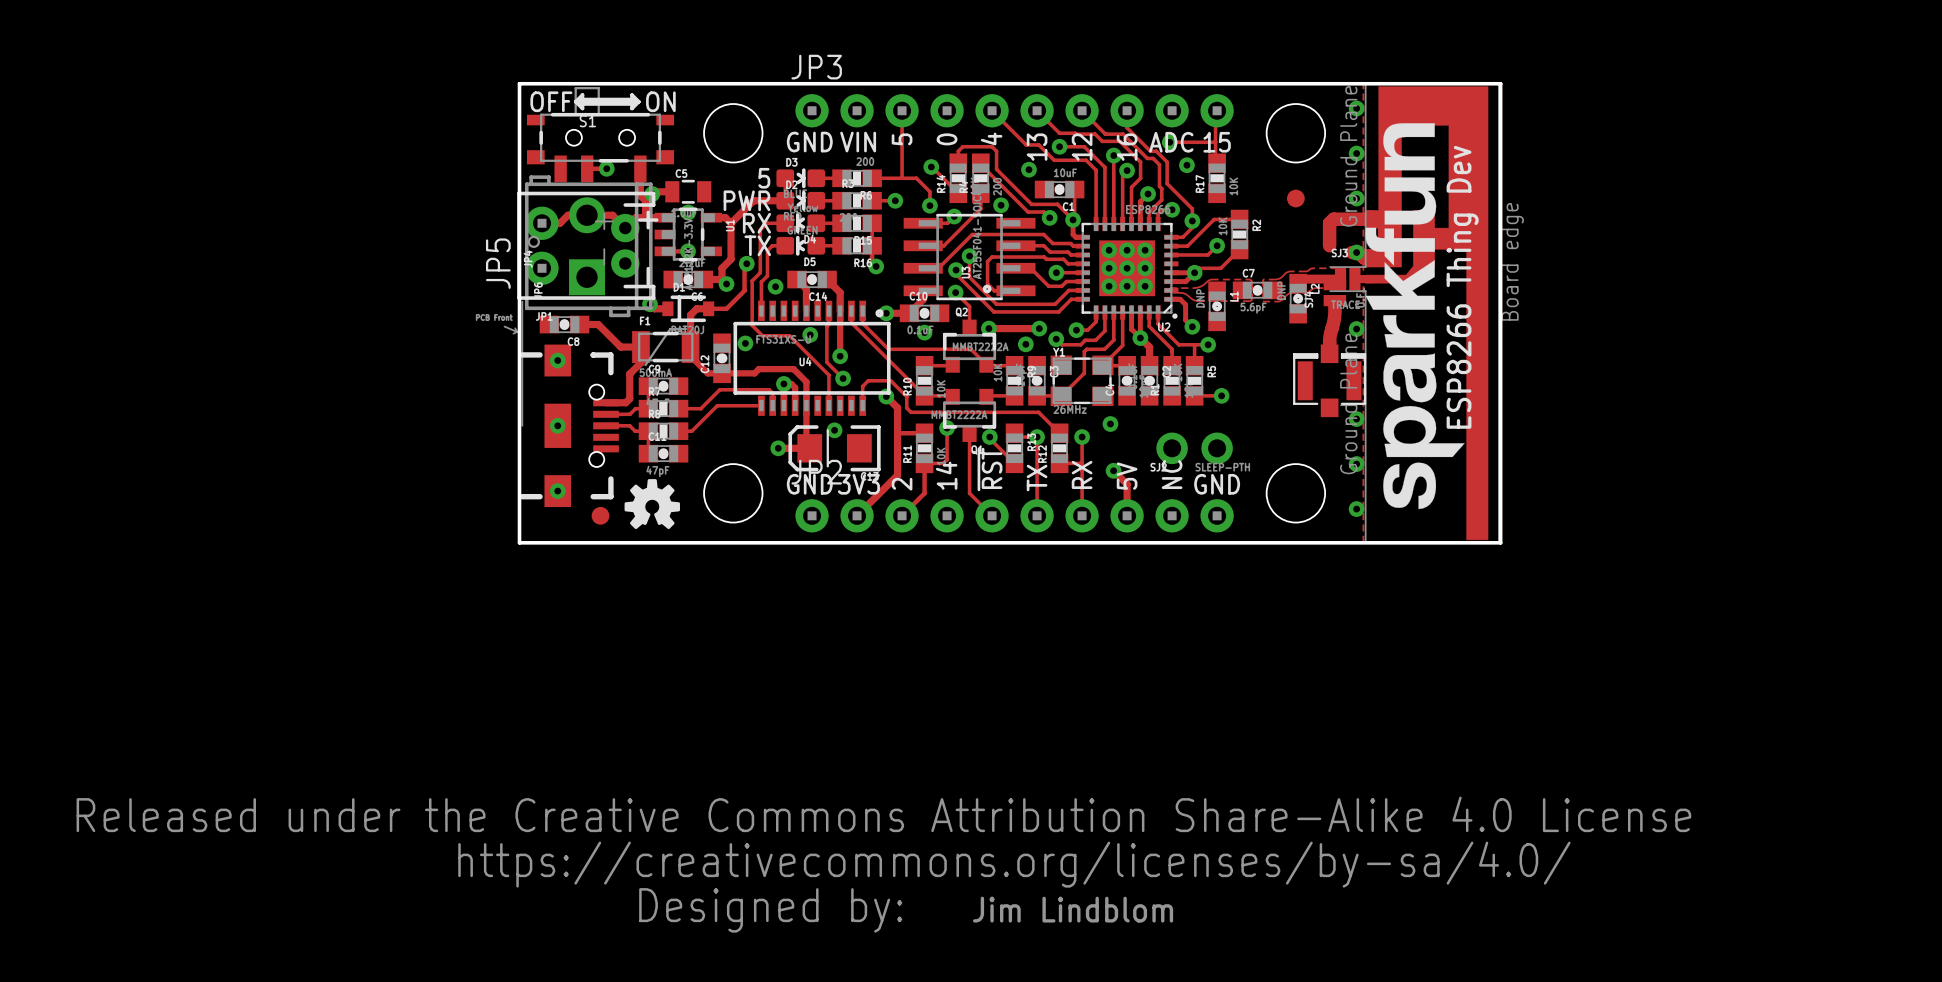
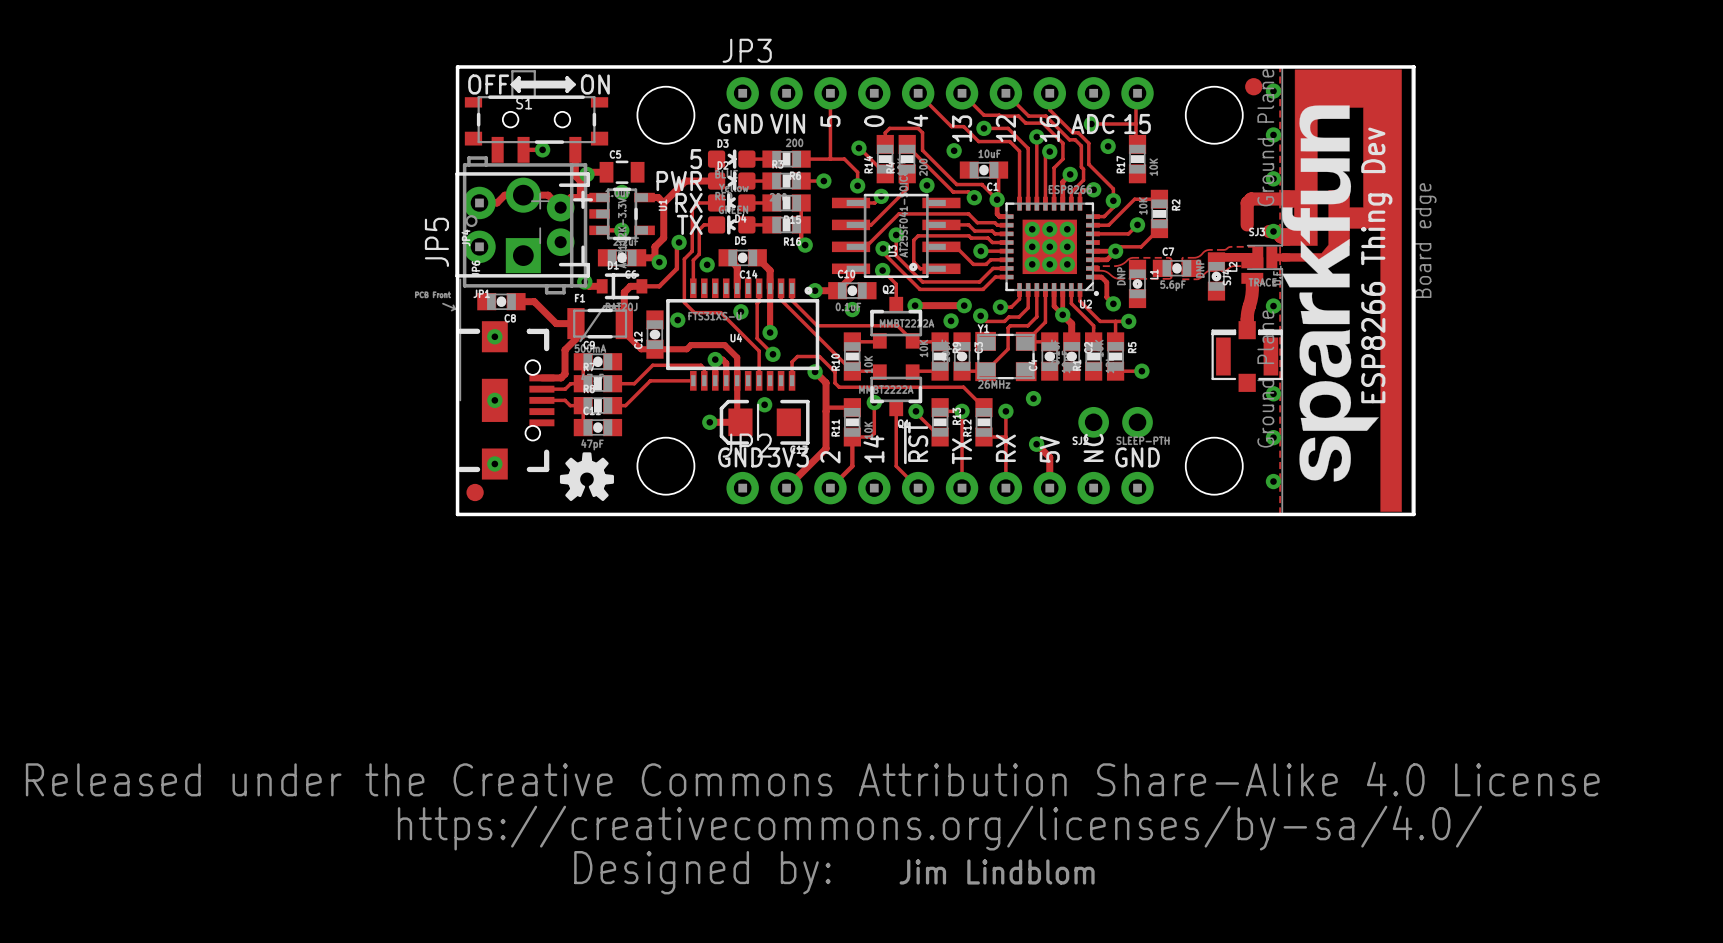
part position: (1295, 198) -> (1253, 86)
part position: (600, 515) -> (475, 492)

